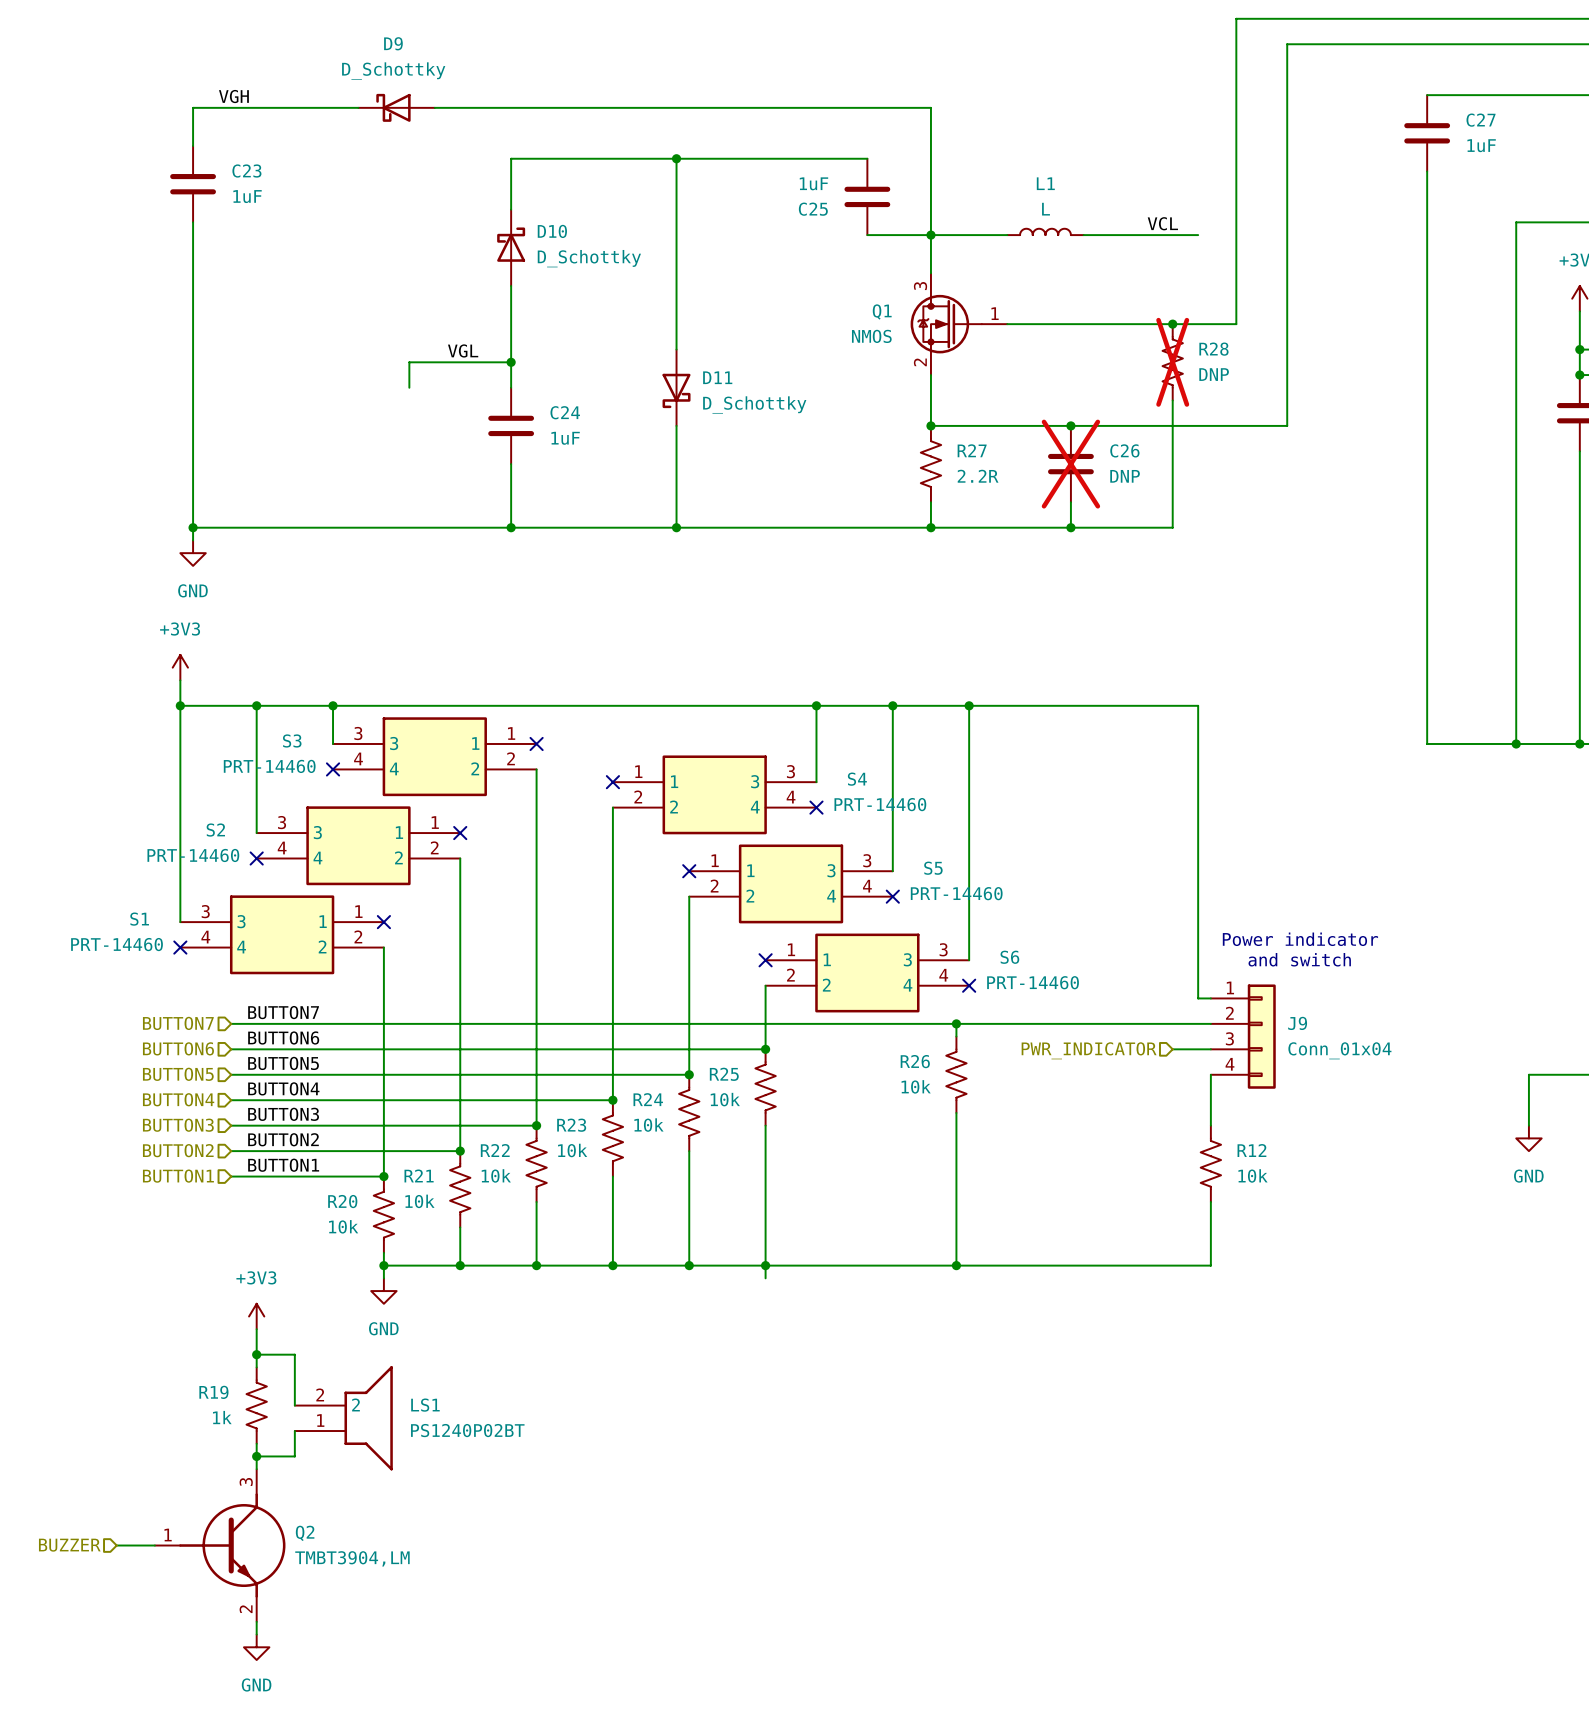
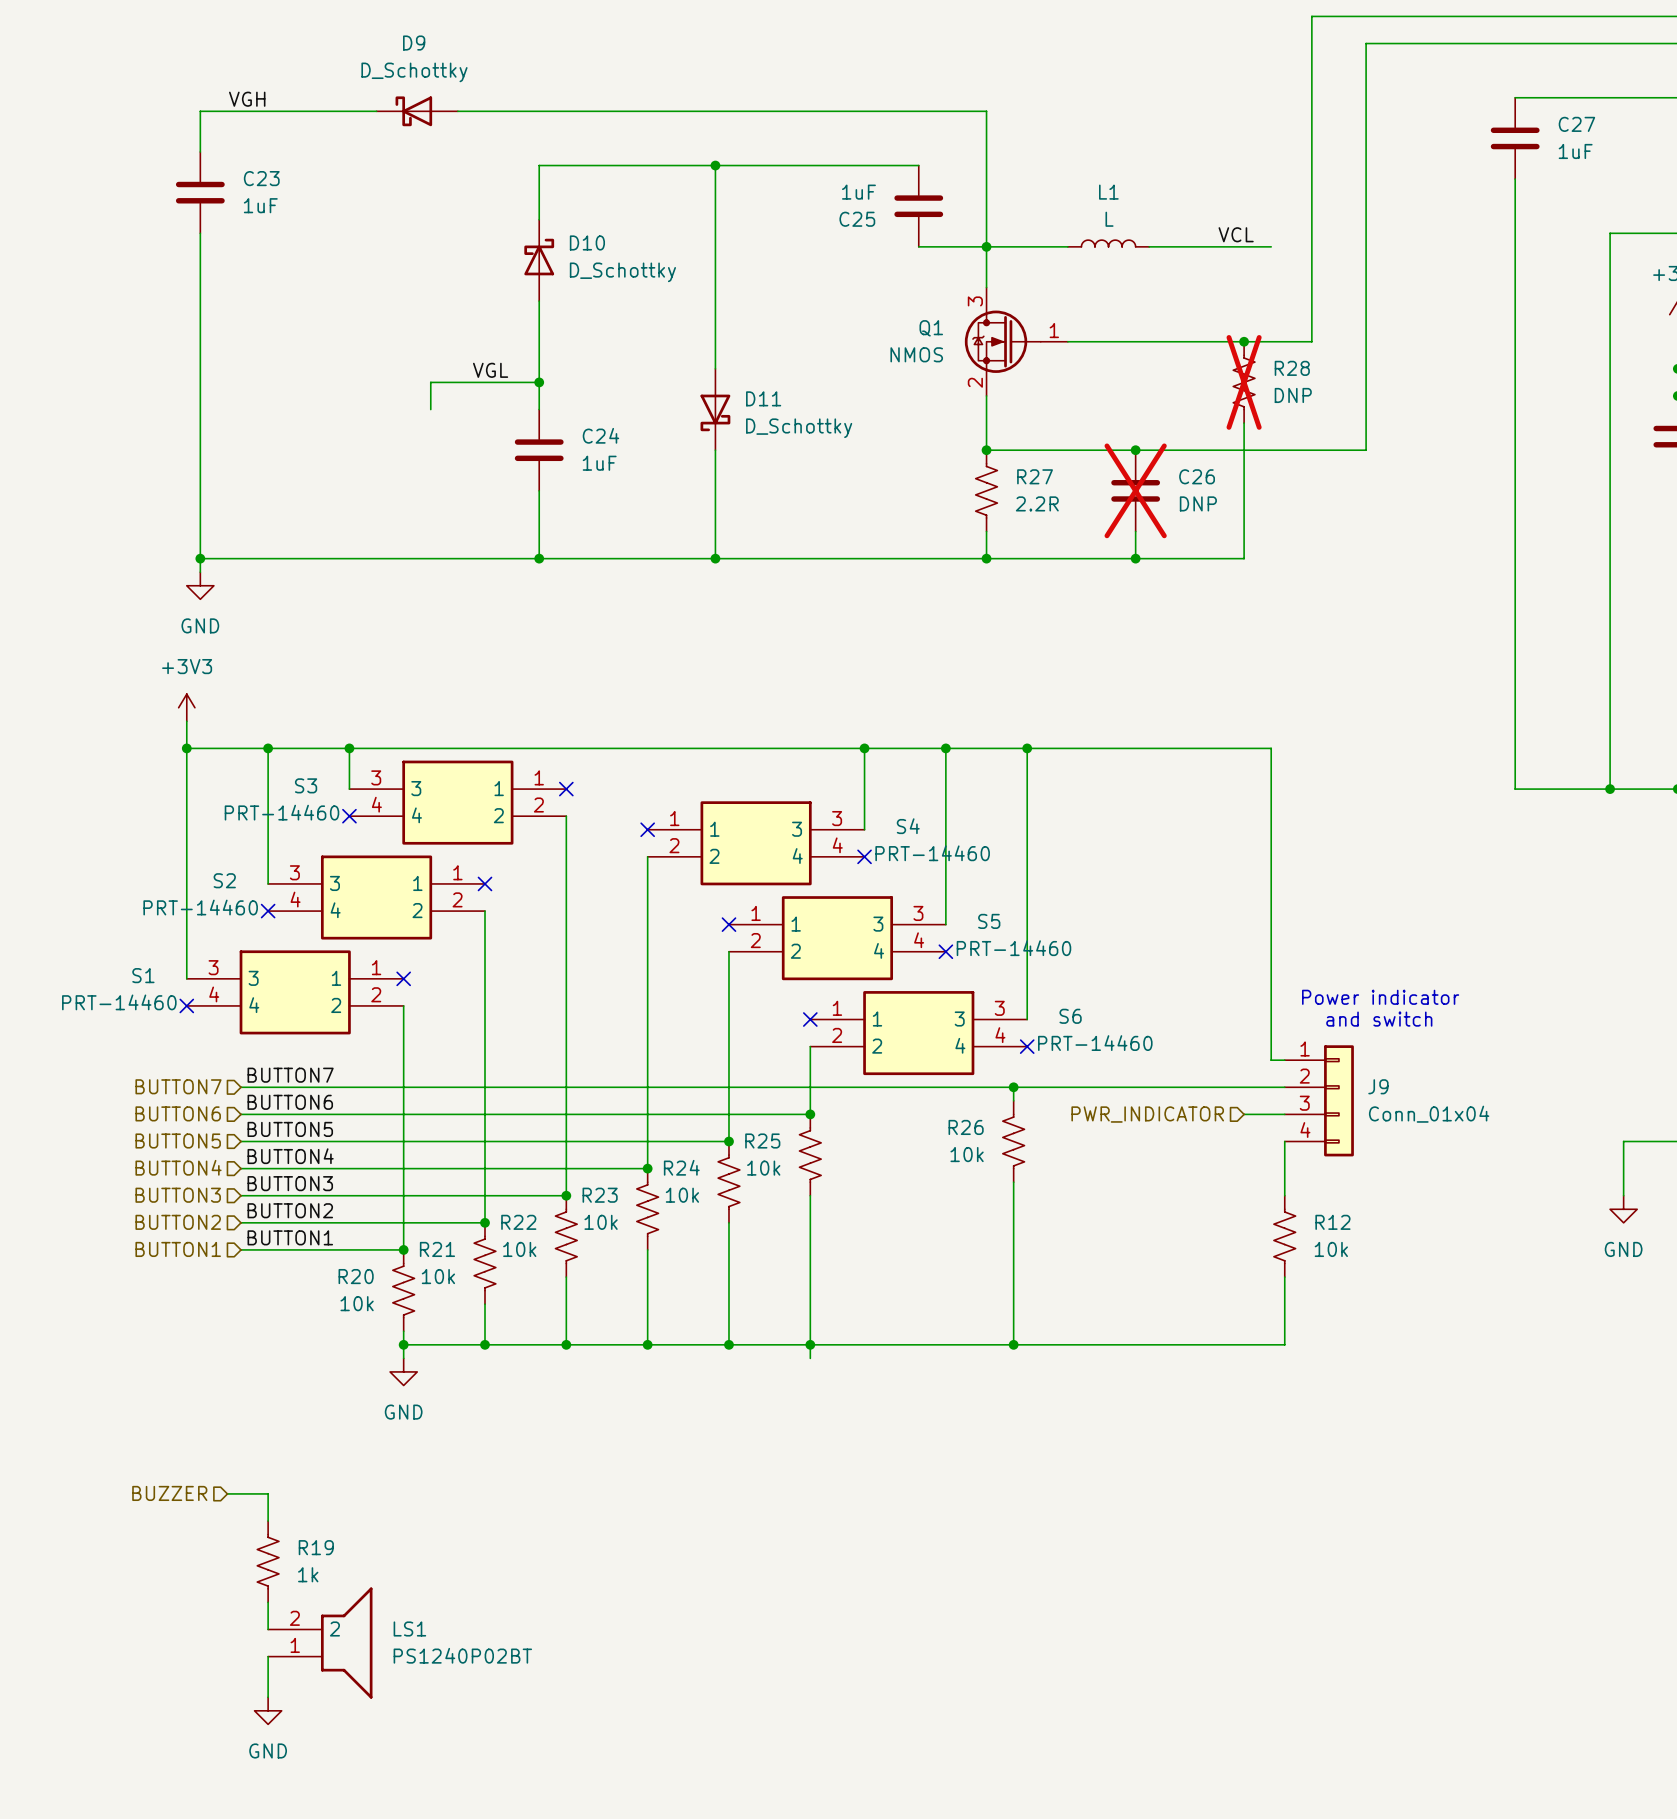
power symbol: +3V3 (256, 1316) -> none
wire: (256, 1329) (256, 1367) -> (268, 1656) (268, 1697)
wire: (256, 1354) (294, 1354) (294, 1405) -> none
junction: (256, 1354) -> none
R19 name position: R19 (213, 1392) -> R19 (316, 1547)
wire: none -> (227, 1493) (268, 1493) (268, 1521)
R19 position: (256, 1405) -> (268, 1561)
R19 value position: 1k (222, 1417) -> 1k (308, 1574)
LS1 position: (343, 1418) -> (320, 1643)
wire: (294, 1431) (294, 1456) (256, 1456) -> none
wire: (256, 1443) (256, 1469) -> (268, 1602) (268, 1629)
junction: (256, 1456) -> none
hierarchical label position: BUZZER (69, 1545) -> BUZZER (169, 1493)
wire: (116, 1545) (154, 1545) -> none
Q2: TMBT3904,LM (220, 1545) -> none
wire: (256, 1621) (256, 1634) -> none
power symbol position: GND (256, 1647) -> GND (268, 1710)

